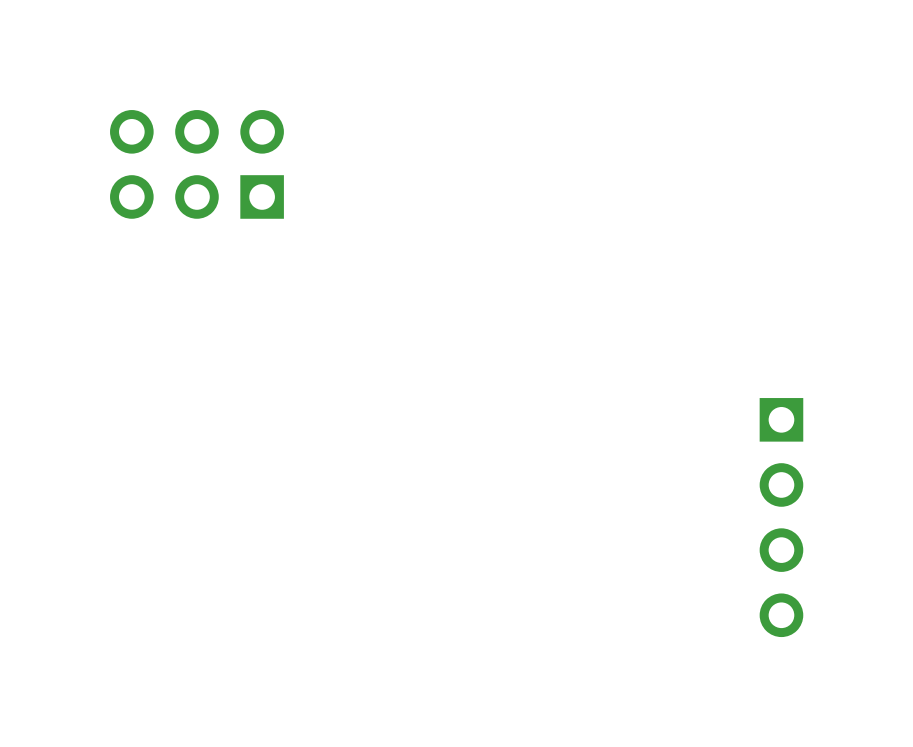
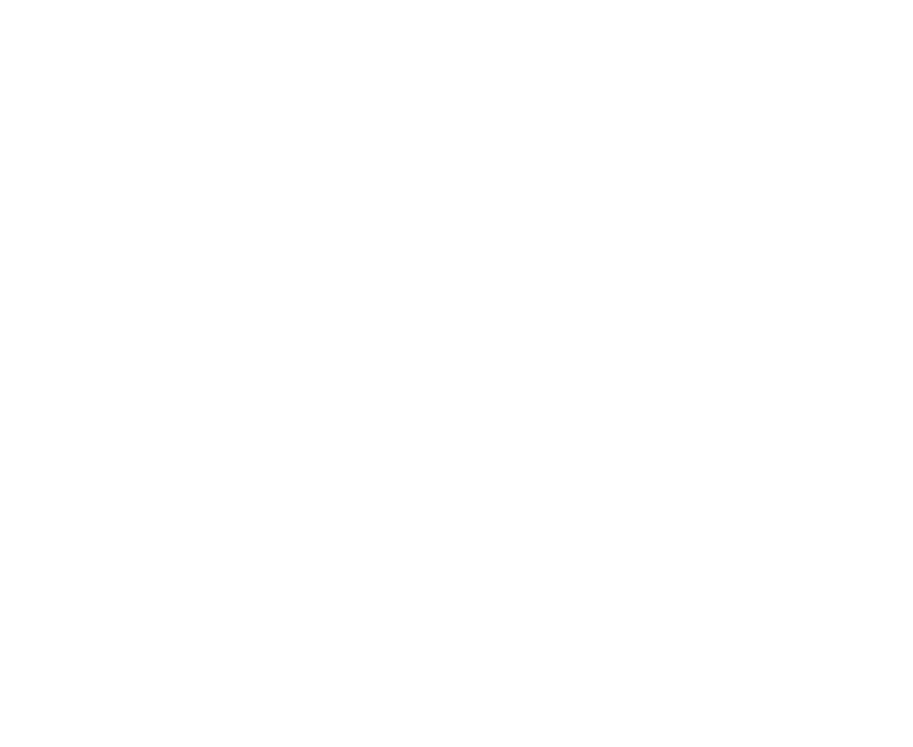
part: (196, 164) -> none
part: (781, 517) -> none

